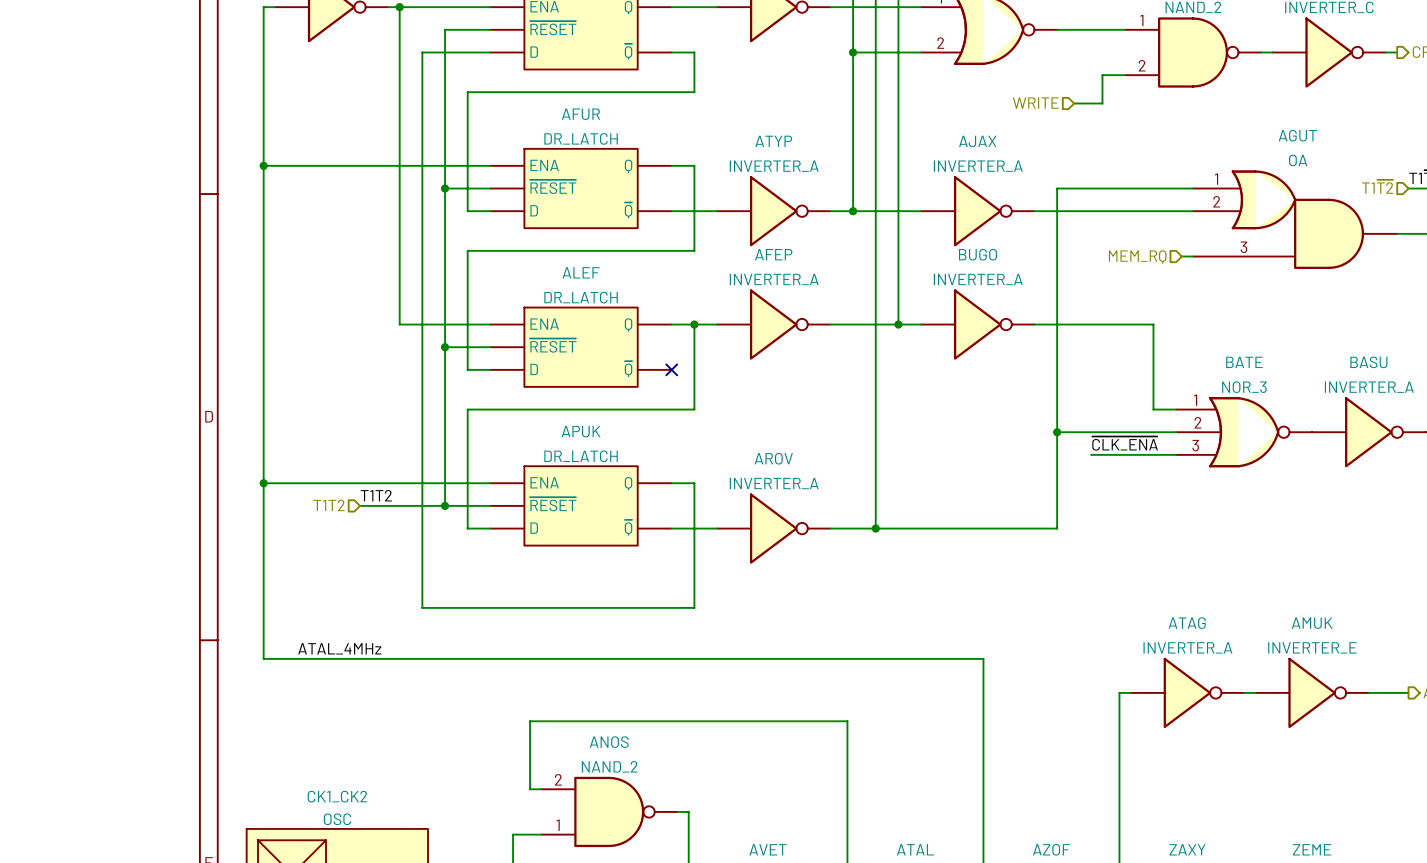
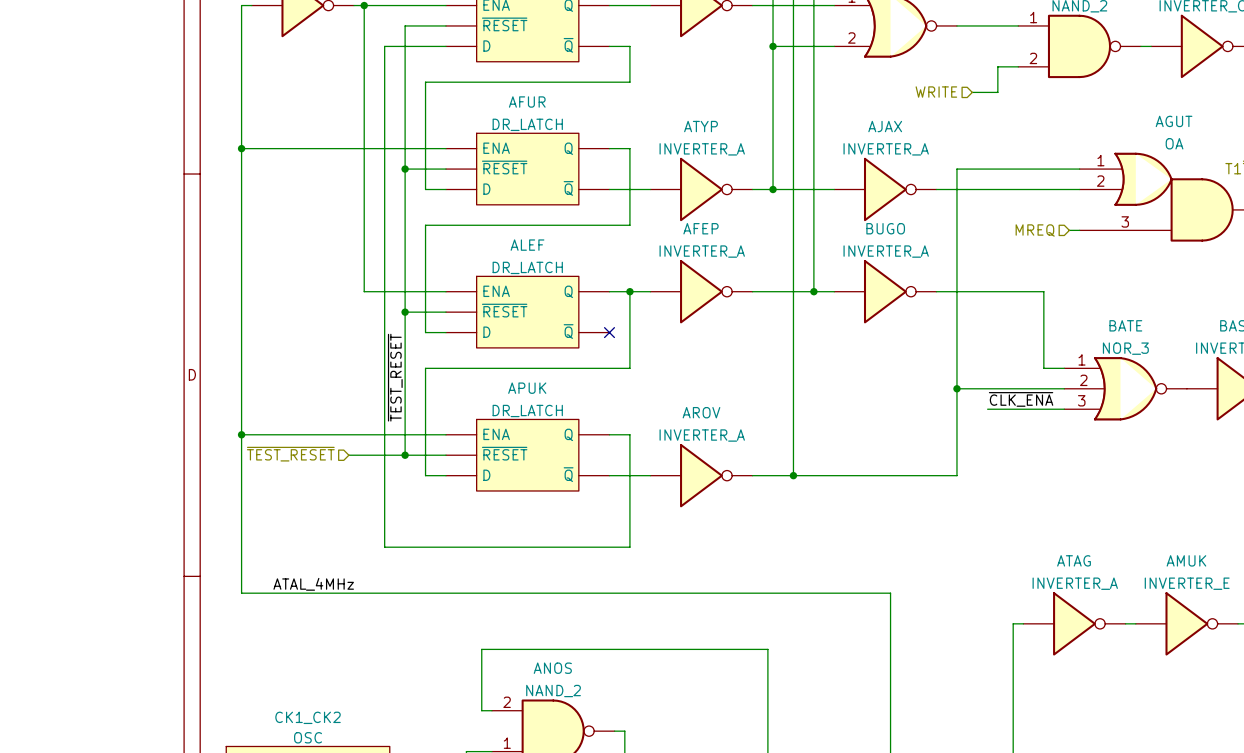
hierarchical label: MEM_RQ (1137, 256) -> MREQ (1035, 230)
label: none -> ~{TEST_RESET} (395, 377)
label: T1T2 (376, 495) -> none
hierarchical label: none -> ~{TEST_RESET} (290, 454)
hierarchical label: T1T2 (329, 505) -> none
wire: (360, 505) (382, 505) -> none

